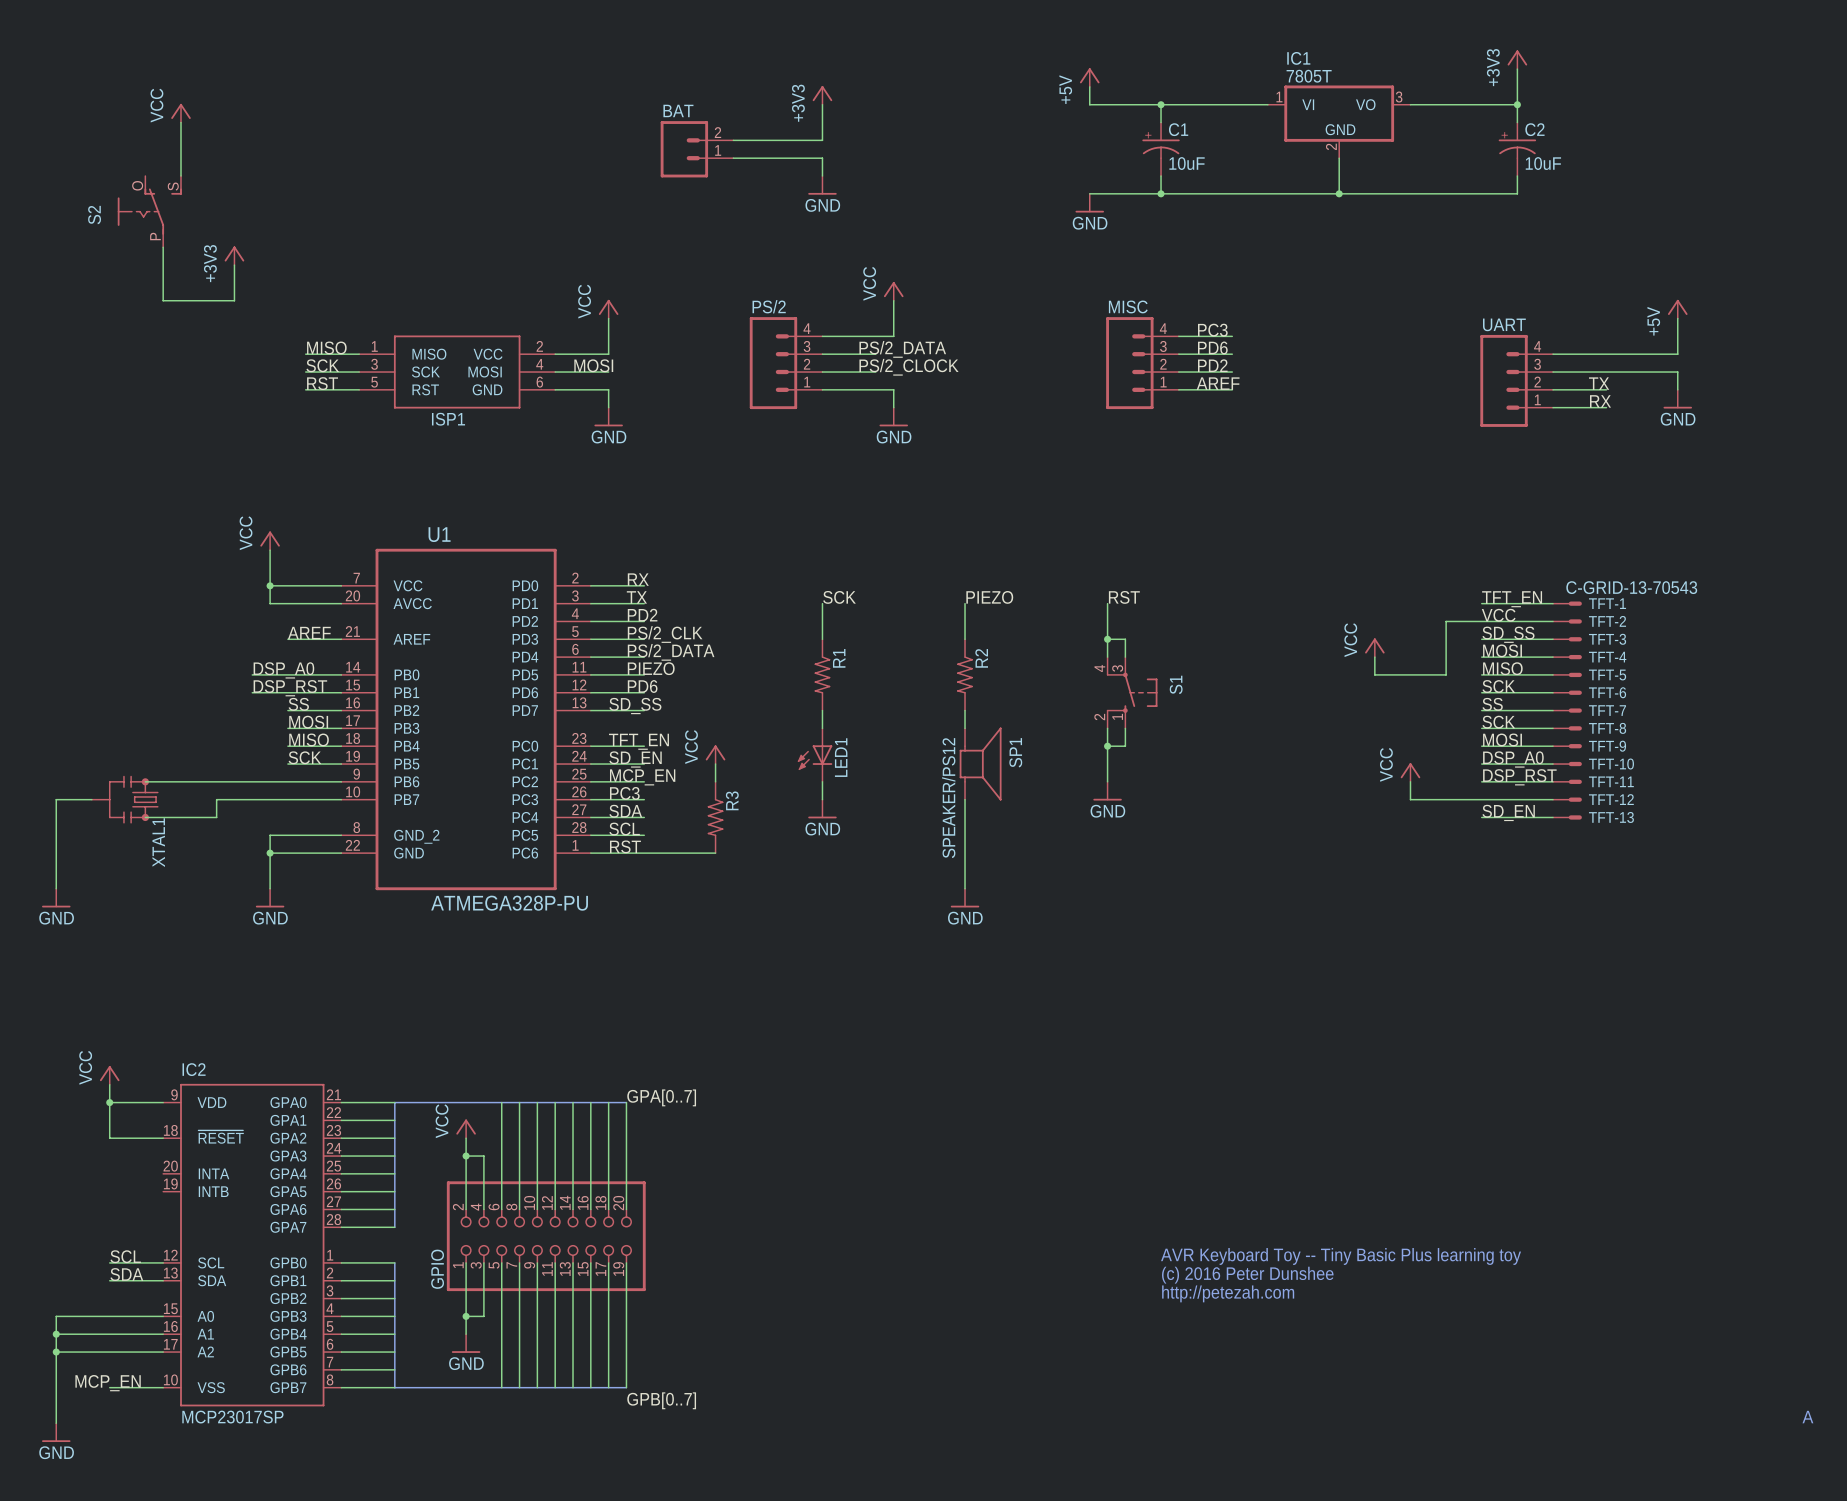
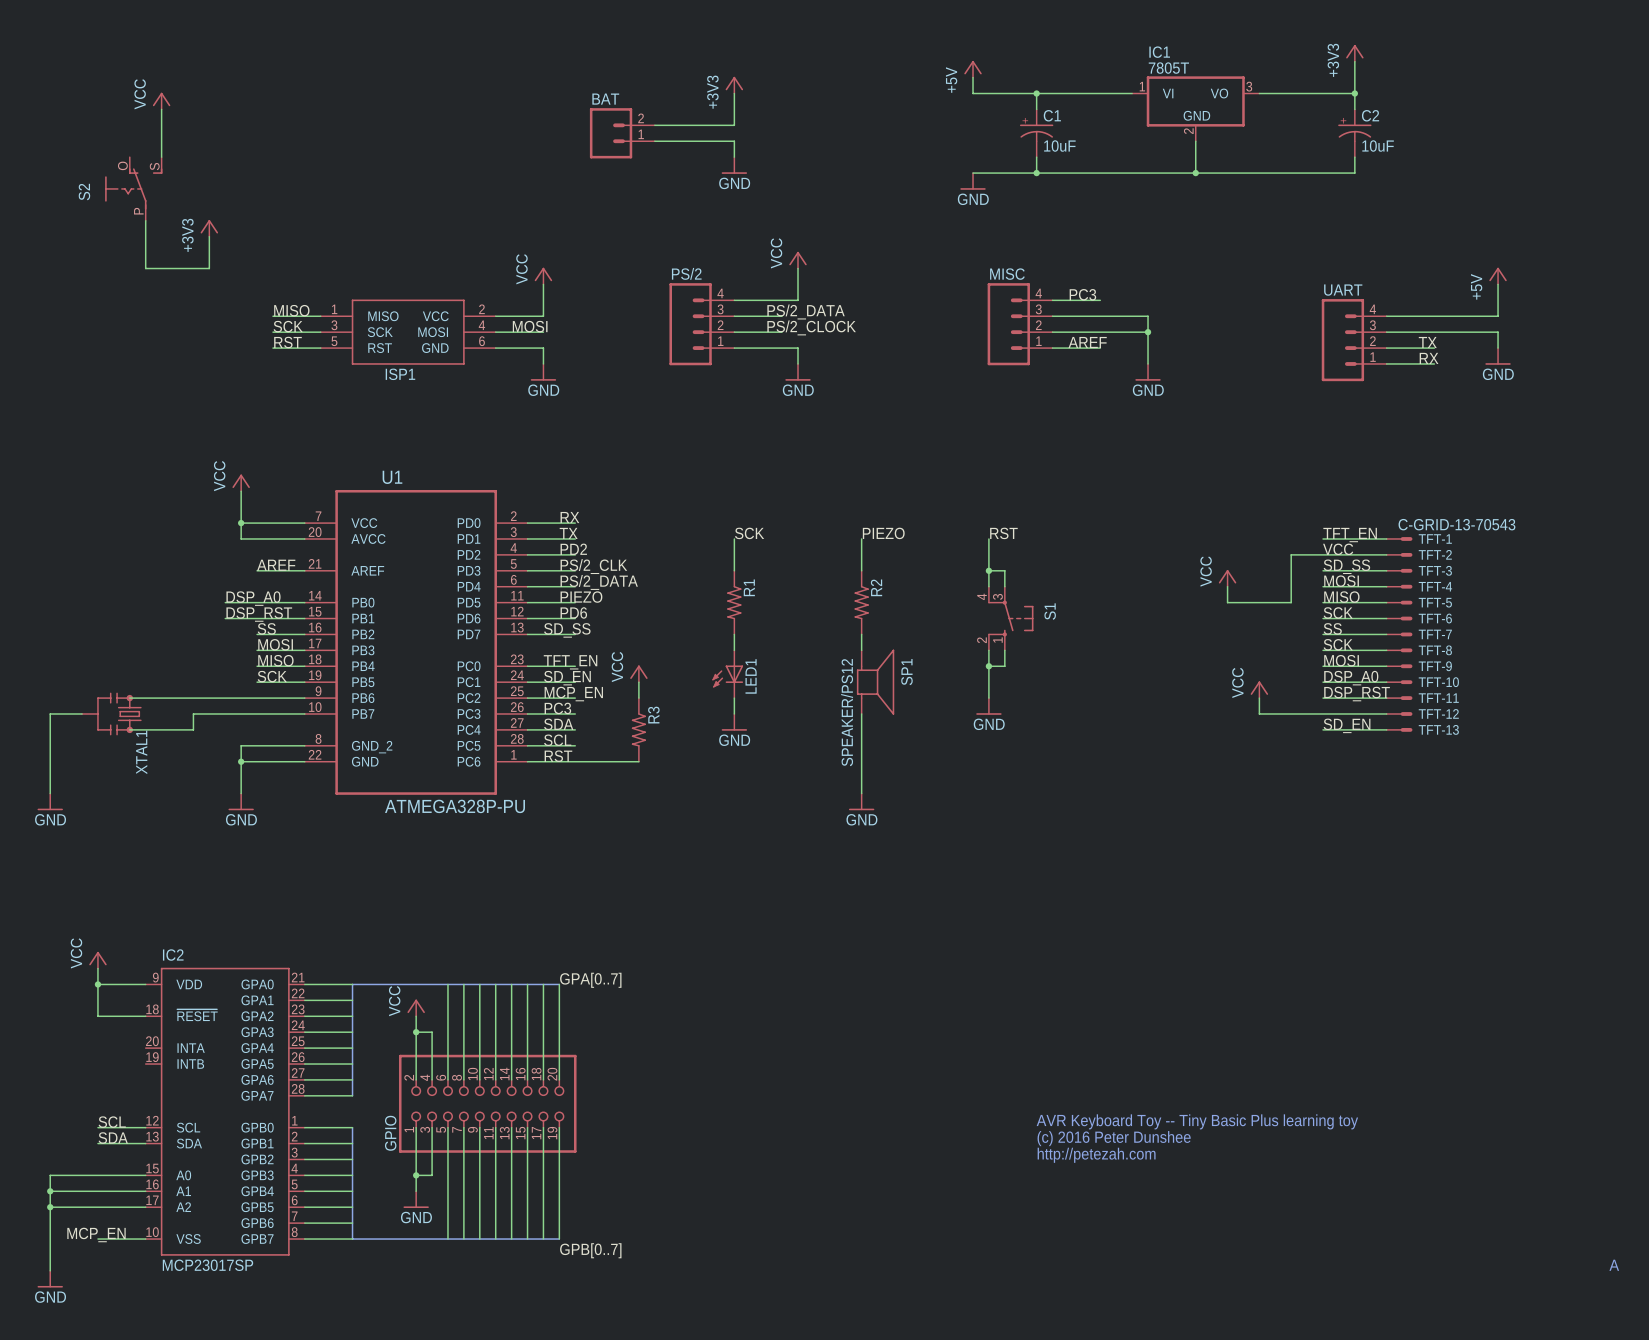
label: PD6 (1212, 347) -> none
wire: none -> (1100, 316) (1148, 316) (1148, 363)
label: PD2 (1212, 365) -> none
wire: none -> (1100, 332) (1148, 332)
junction: none -> (1148, 332)
power symbol: none -> GND (1148, 372)

